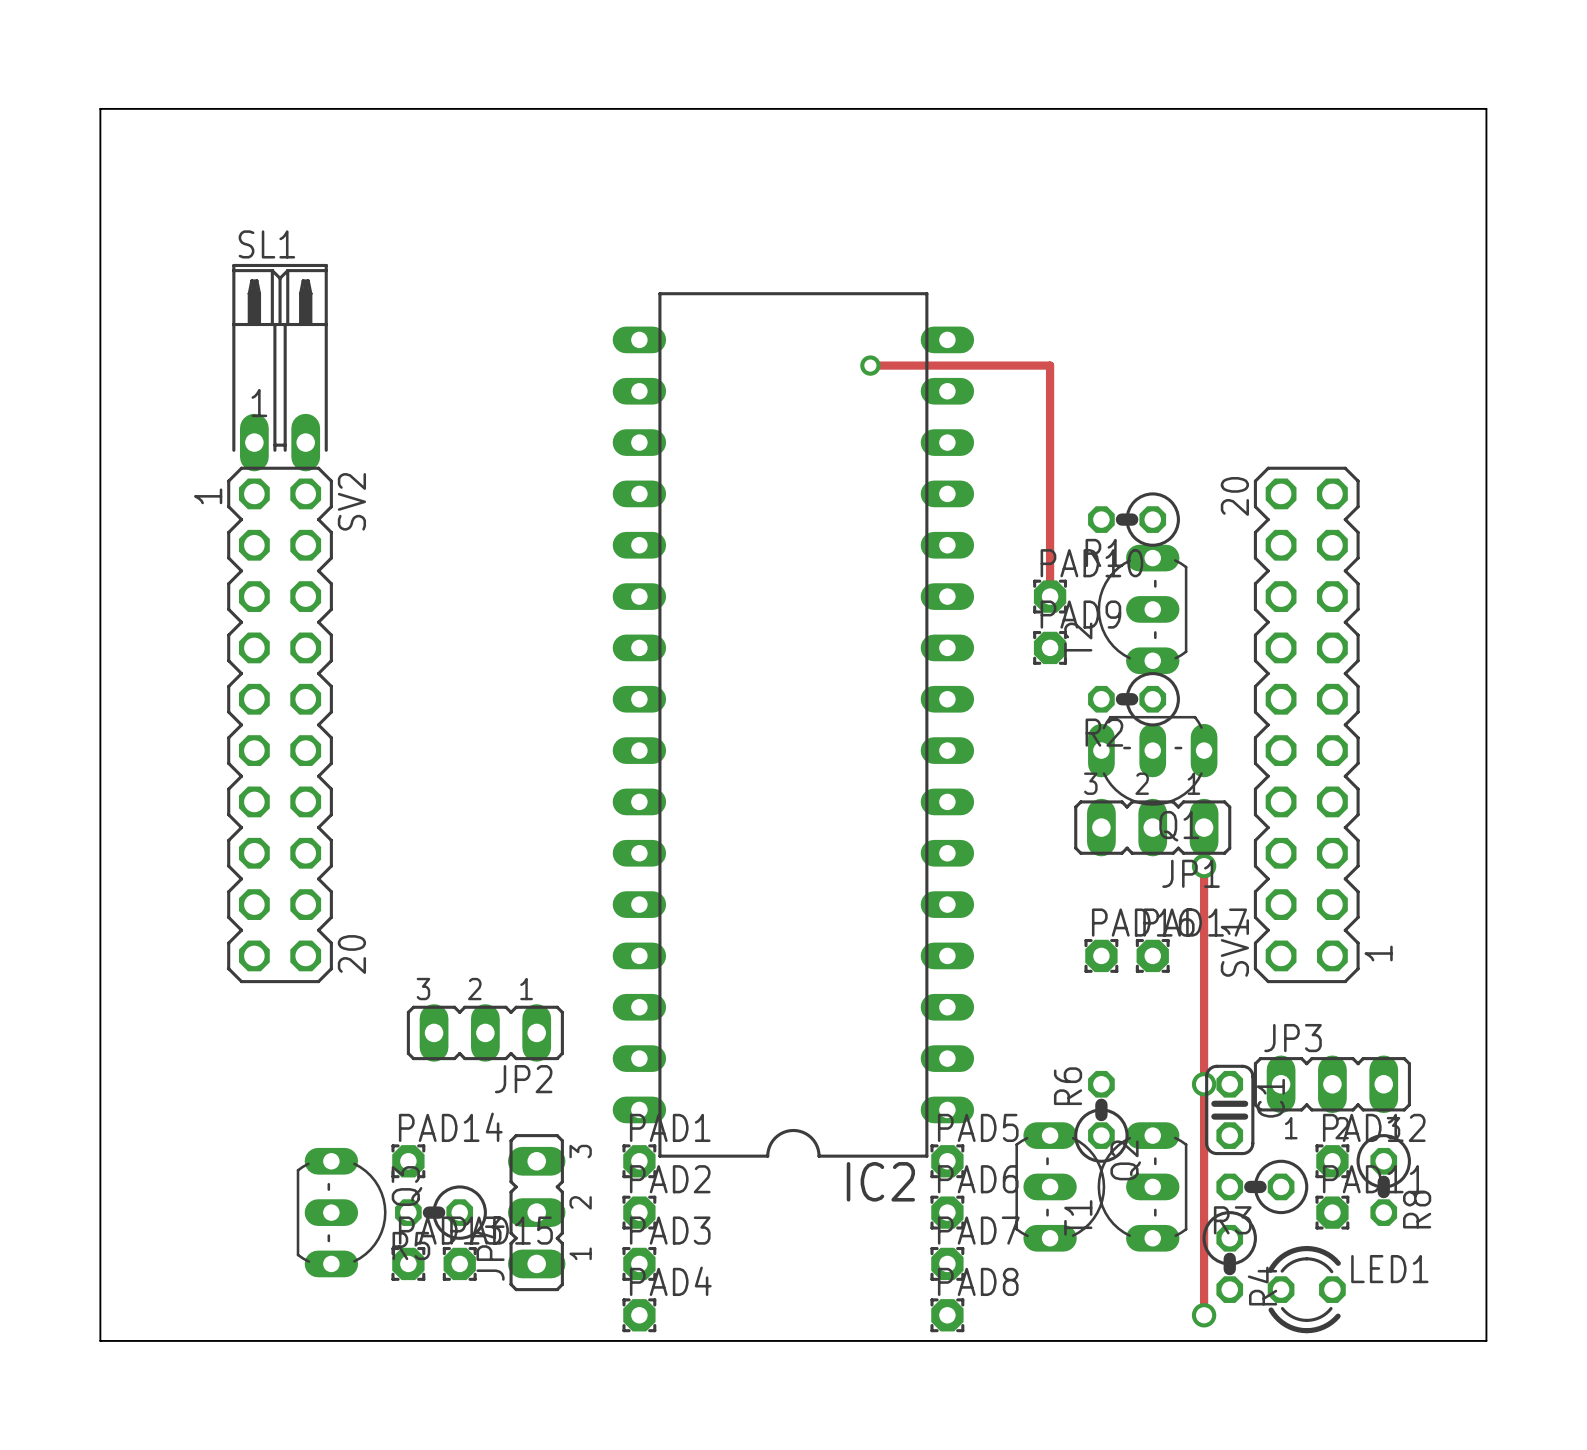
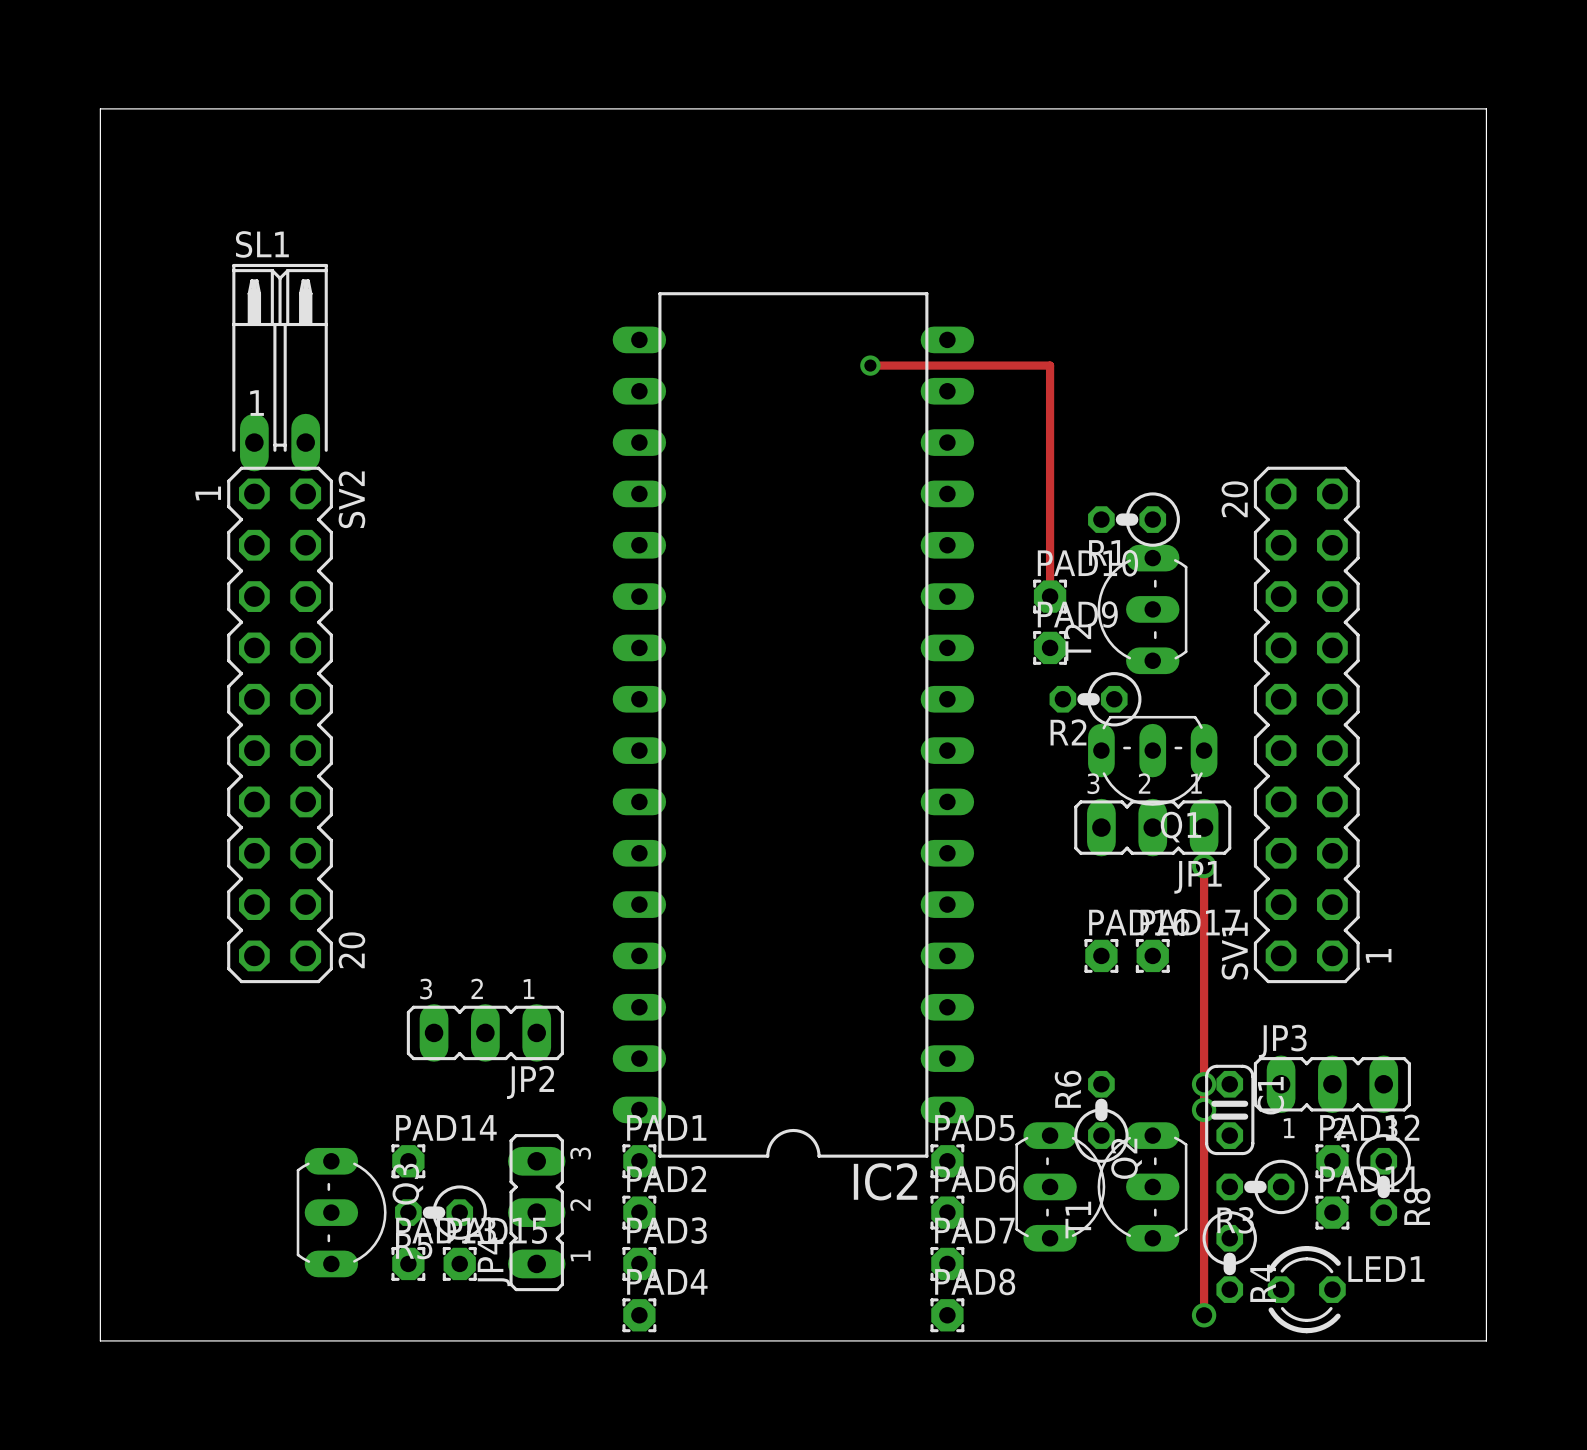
R2 position: (1134, 699) -> (1095, 699)
via: none -> (1204, 1109)

